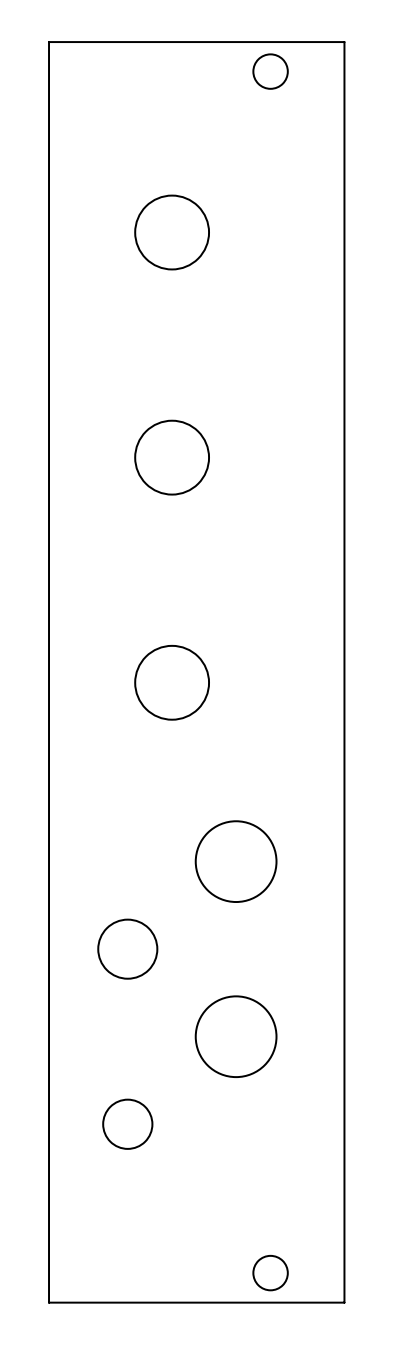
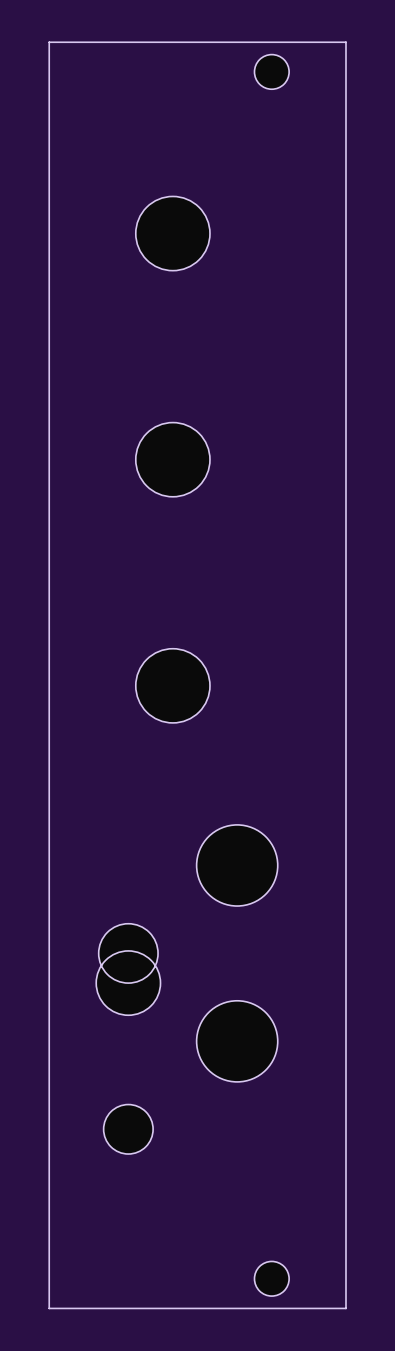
hole: none -> (128, 983)

